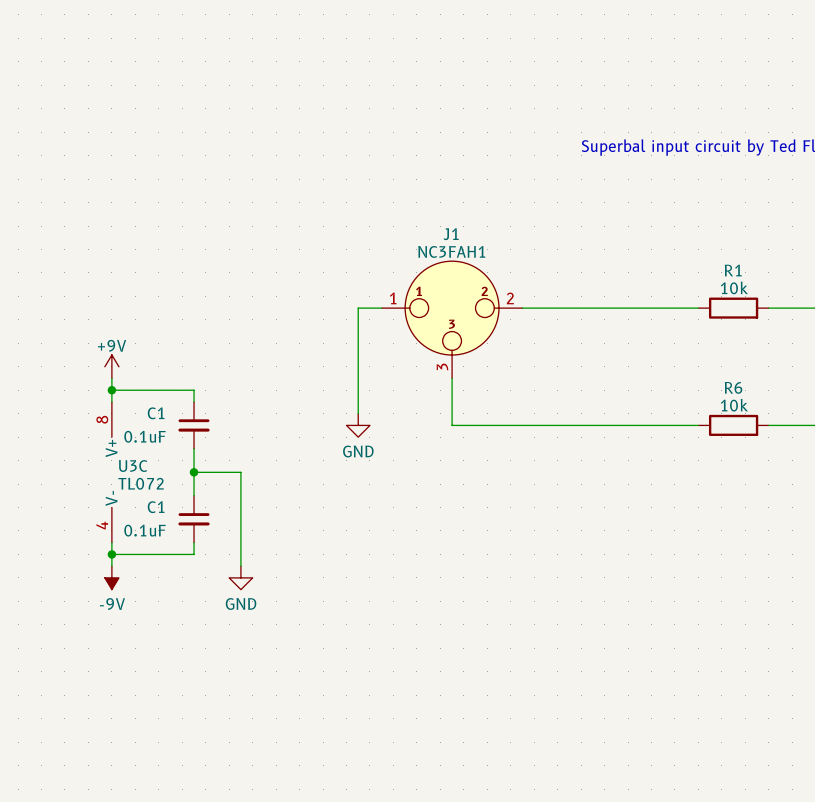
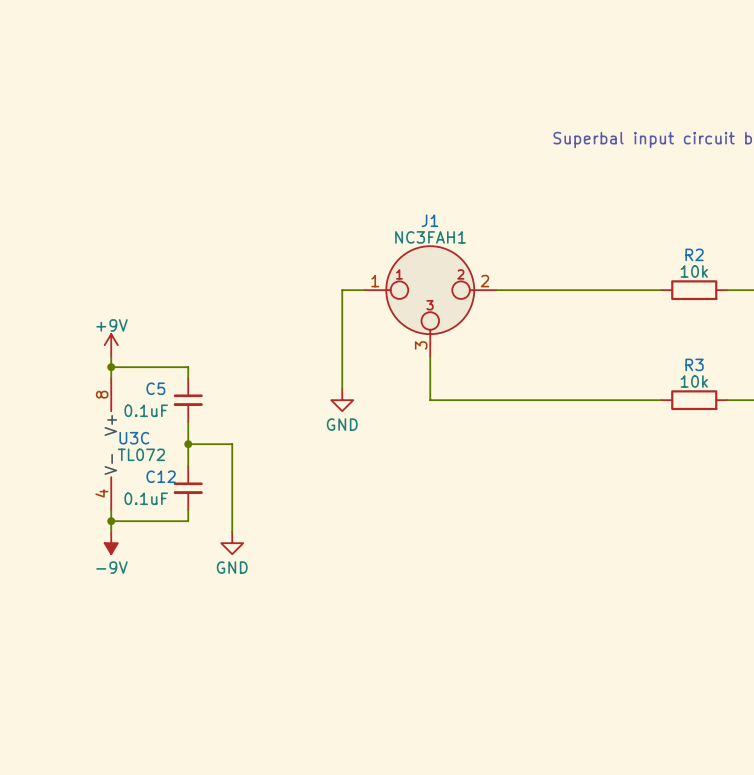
R1 name: R1 (733, 270) -> R2 (694, 254)
R6 name: R6 (733, 387) -> R3 (694, 364)
C1 name: C1 (156, 413) -> C5 (155, 388)
C1 name: C1 (156, 507) -> C12 (161, 476)

